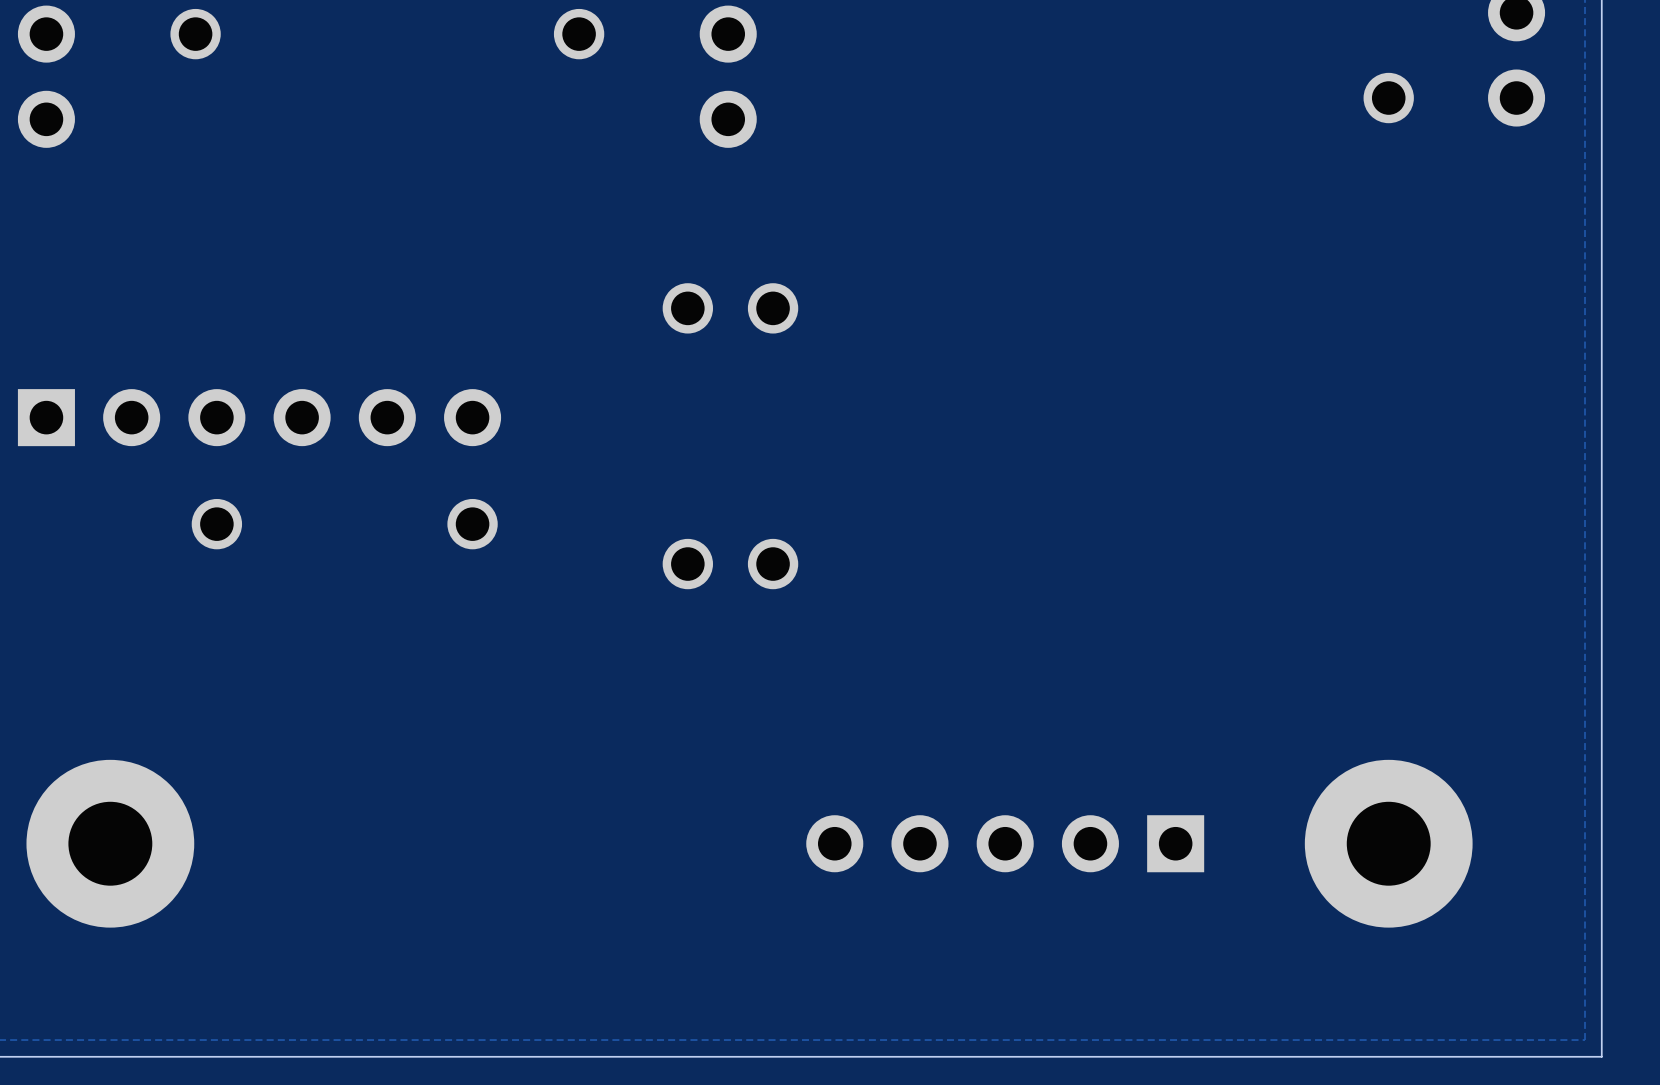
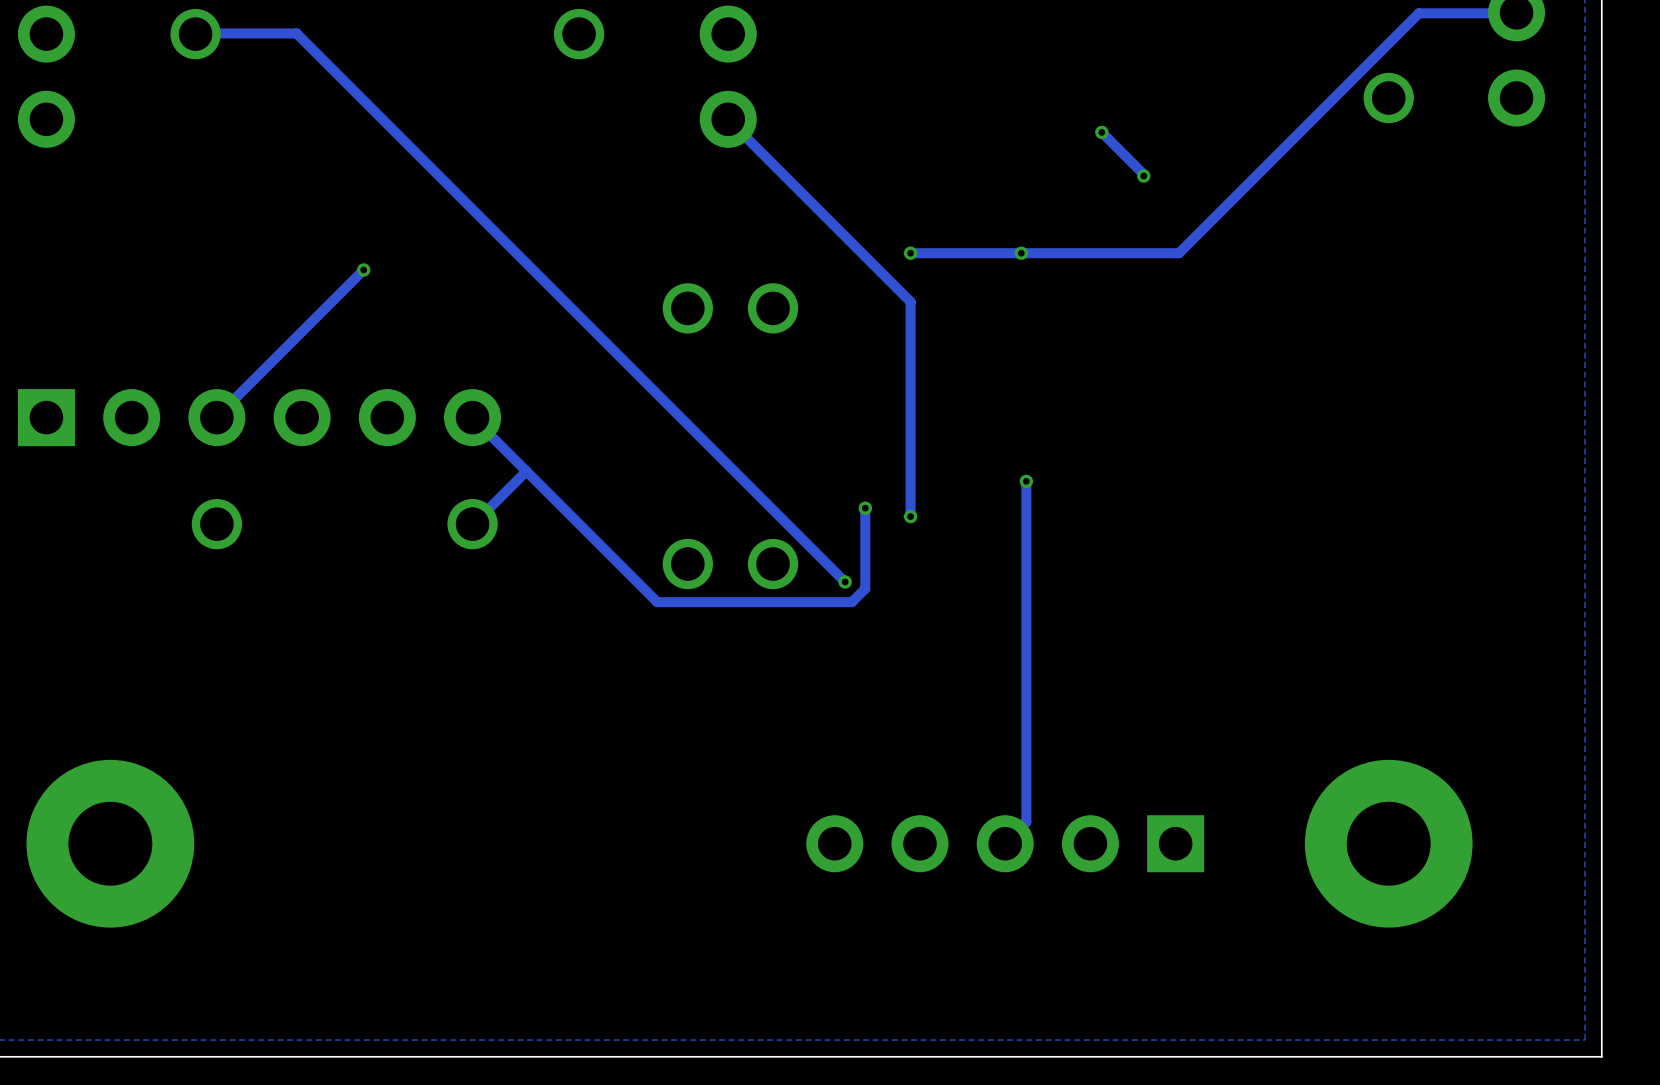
track: none -> (1516, 13) (1418, 13) (1179, 253) (910, 253)
track: none -> (195, 33) (296, 33) (845, 582)
track: none -> (727, 118) (910, 301) (910, 516)
track: none -> (1101, 132) (1143, 174)
via: none -> (1101, 132)
via: none -> (1143, 176)
via: none -> (910, 253)
via: none -> (1021, 253)
track: none -> (363, 269) (216, 417)
via: none -> (363, 269)
track: none -> (472, 417) (657, 602) (851, 602) (865, 588) (865, 508)
track: none -> (526, 471) (472, 524)
track: none -> (1026, 481) (1026, 821) (1004, 843)
via: none -> (1026, 481)
via: none -> (865, 508)
via: none -> (910, 516)
via: none -> (845, 582)

